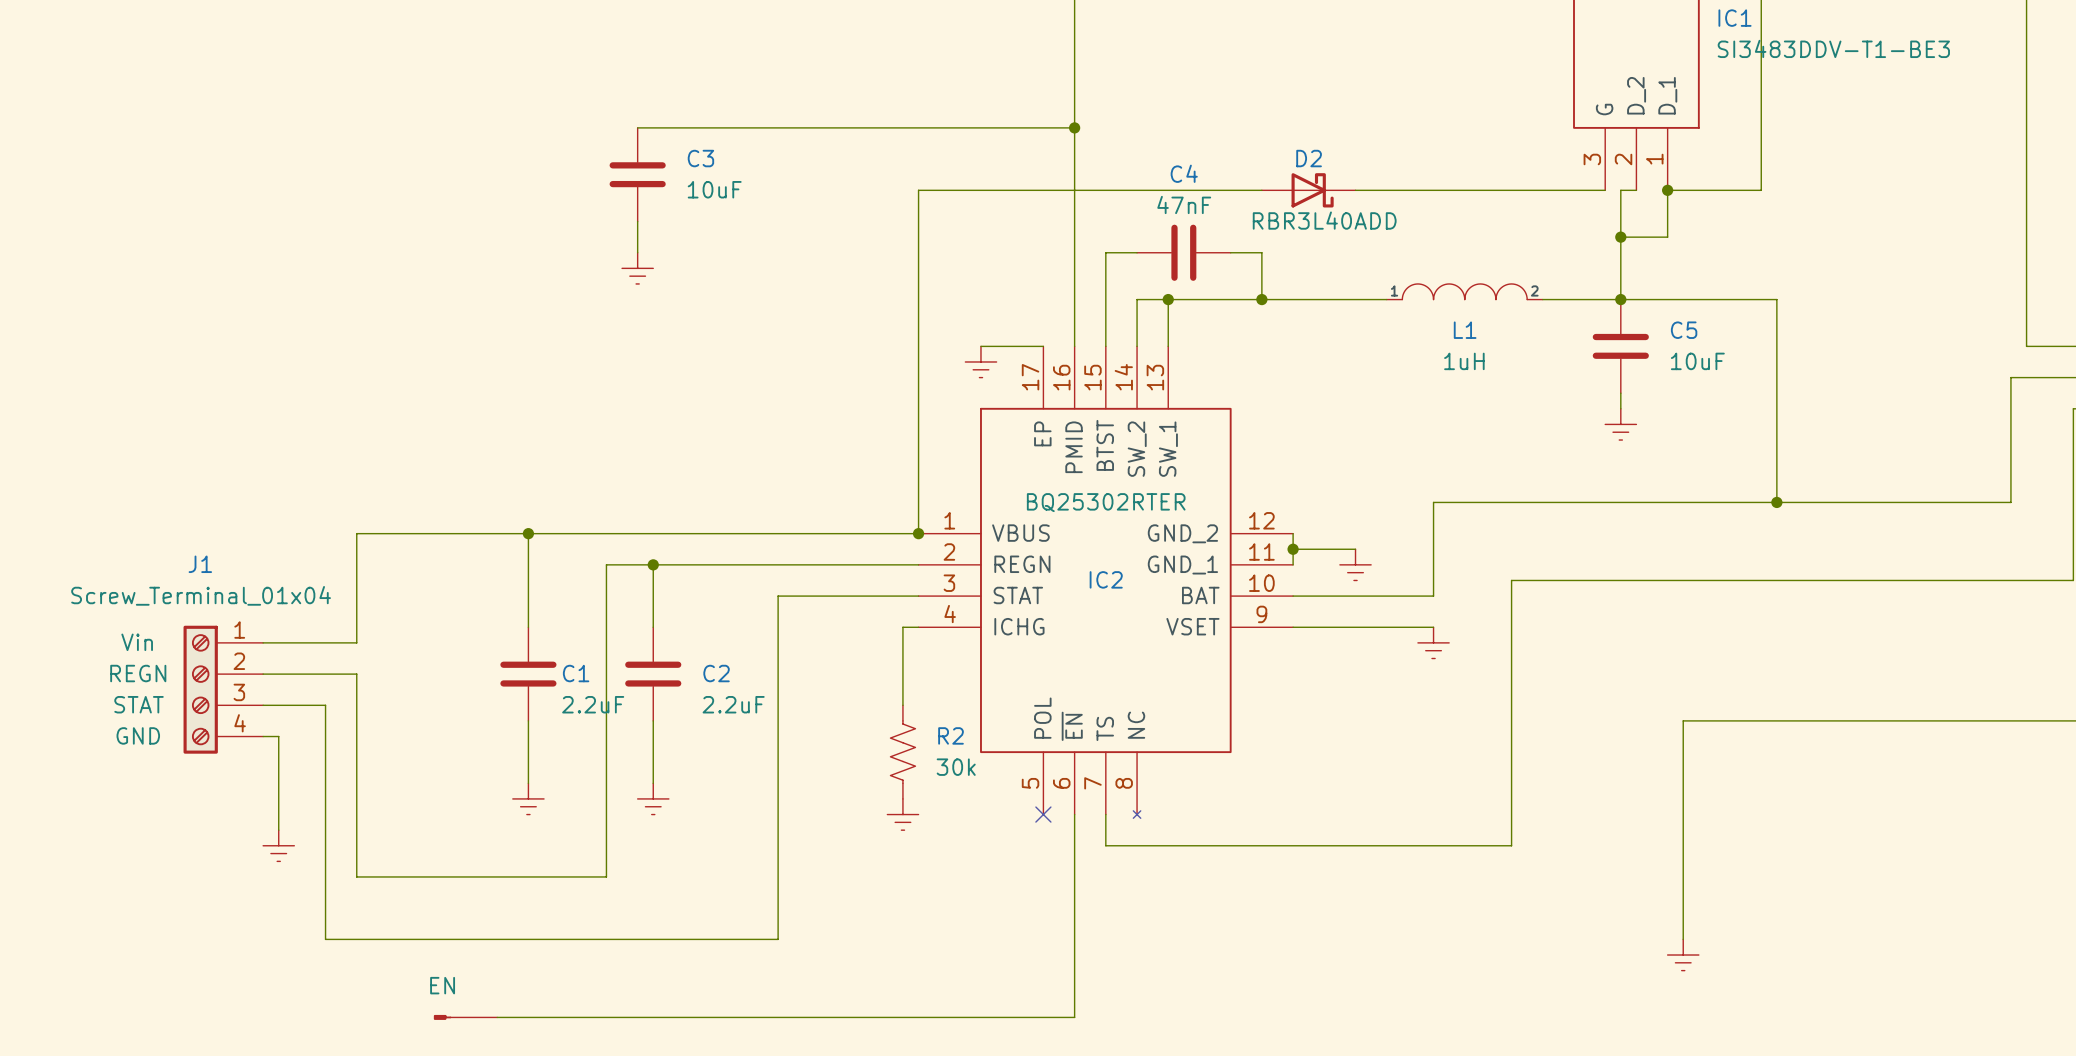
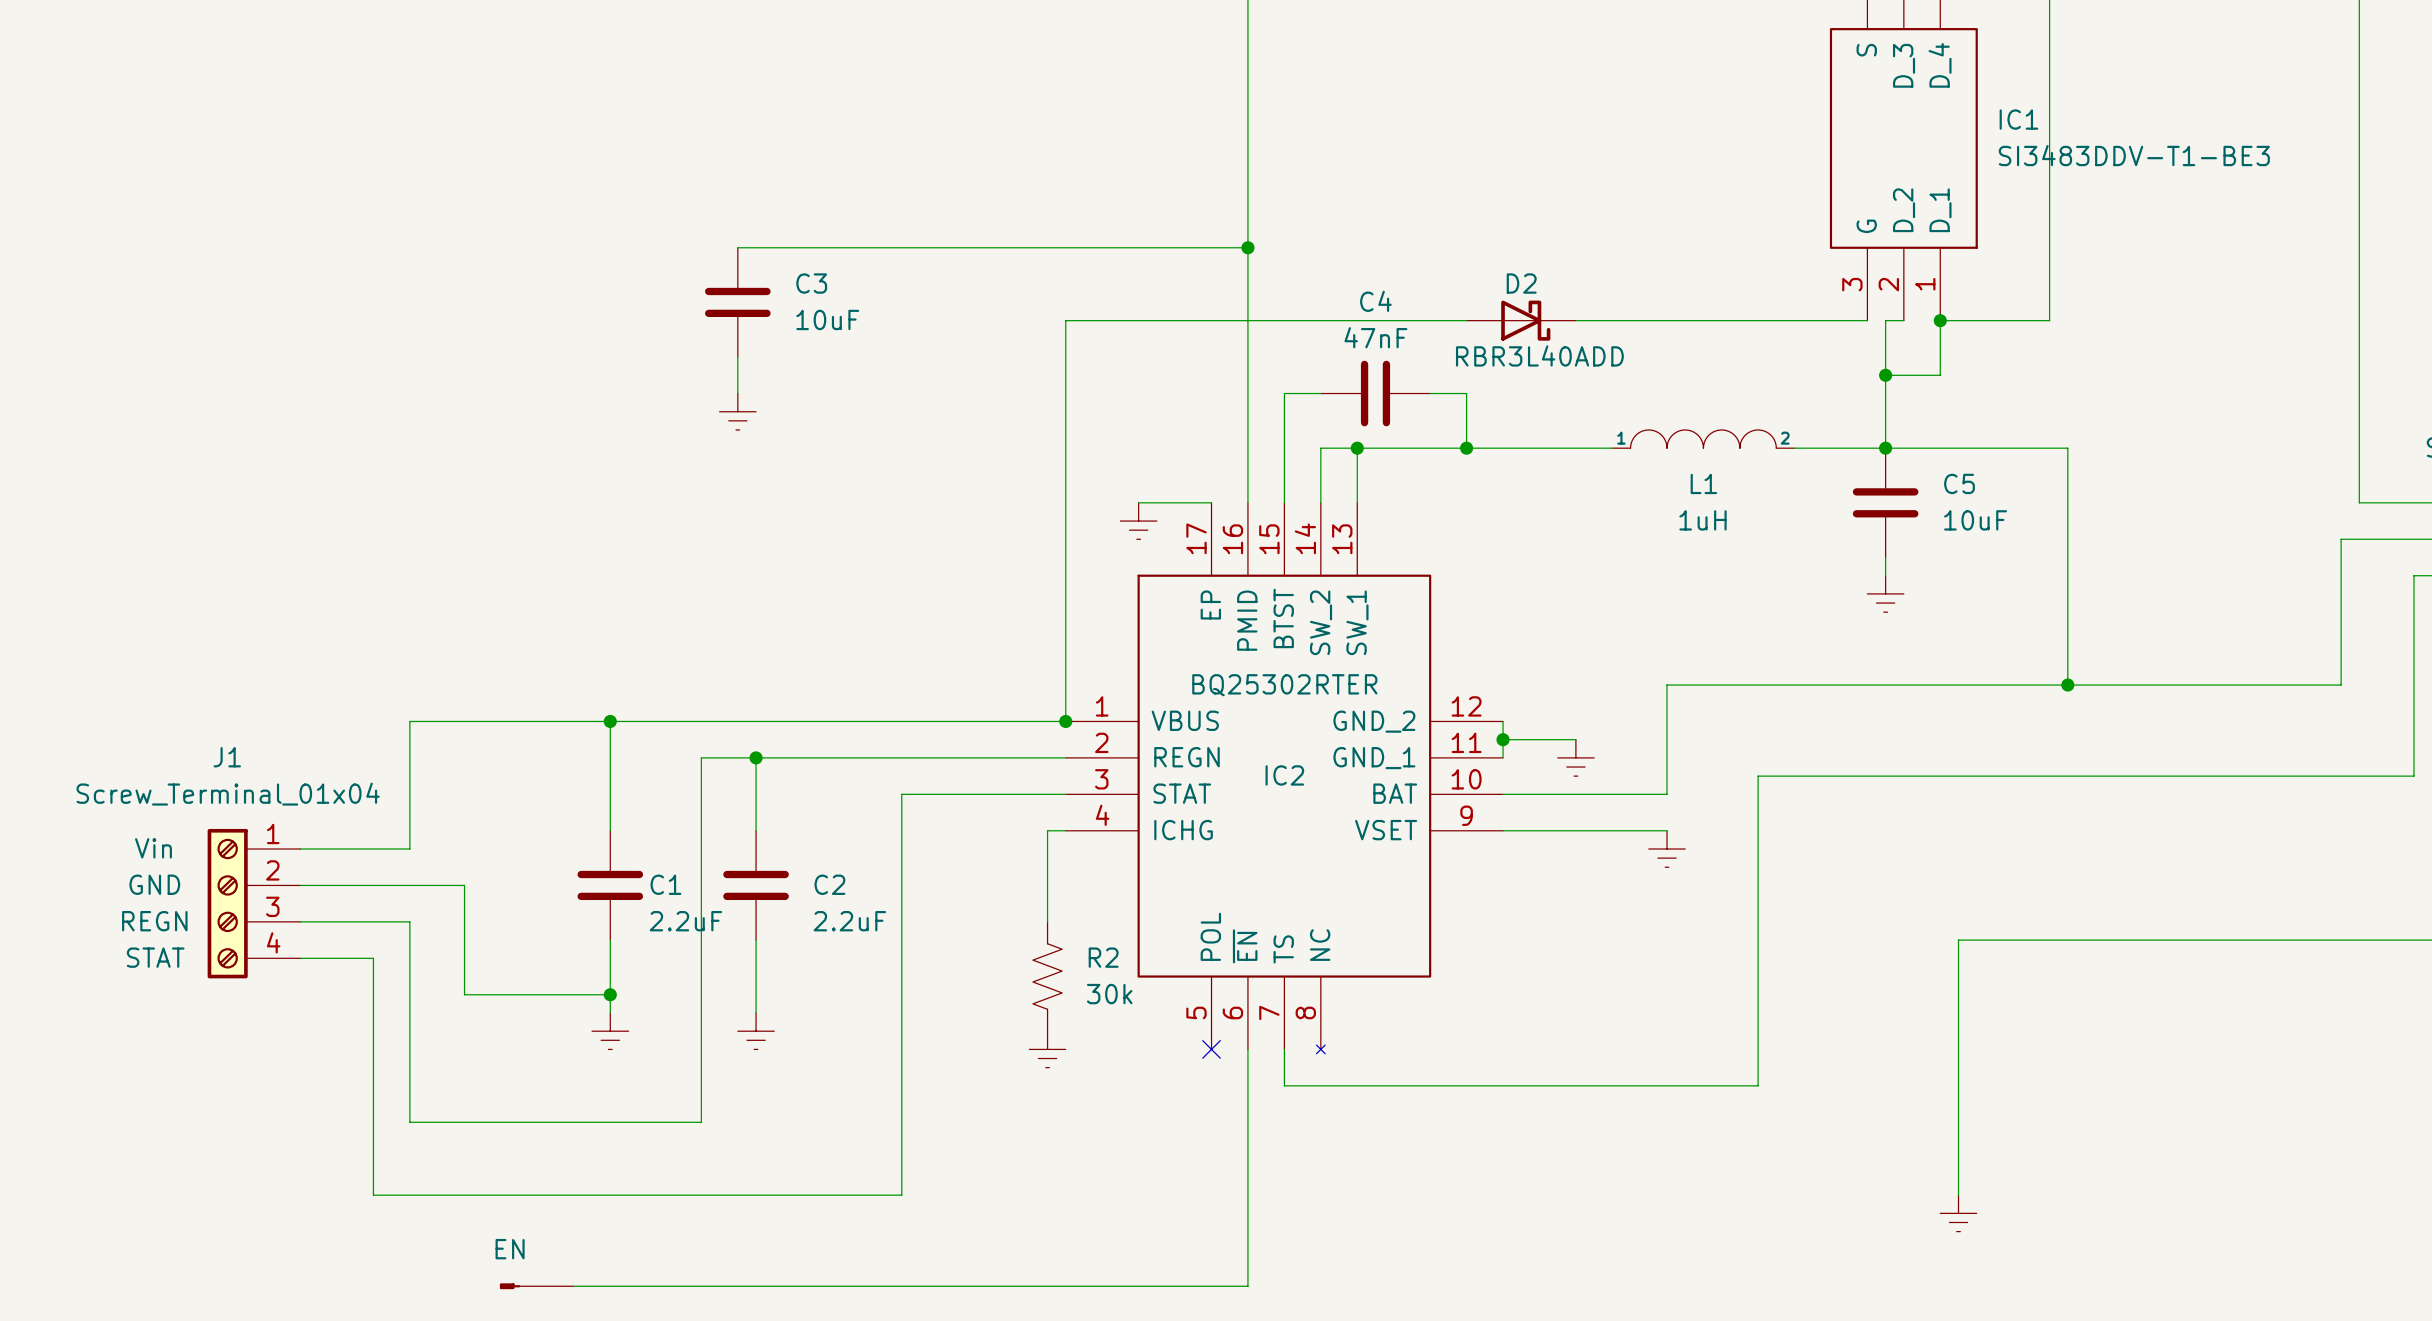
J1 text position: REGN (138, 673) -> REGN (154, 921)
wire: (356, 674) (356, 705) -> (409, 885) (464, 885) (464, 994) (610, 994)
J1 text position: STAT (139, 704) -> STAT (155, 957)
wire: (325, 705) (325, 736) -> (373, 921) (409, 921)
J1 text position: GND (138, 735) -> GND (154, 884)
wire: (278, 736) (278, 830) -> (318, 958) (373, 958)
junction: none -> (610, 994)
power symbol: (278, 845) -> none

